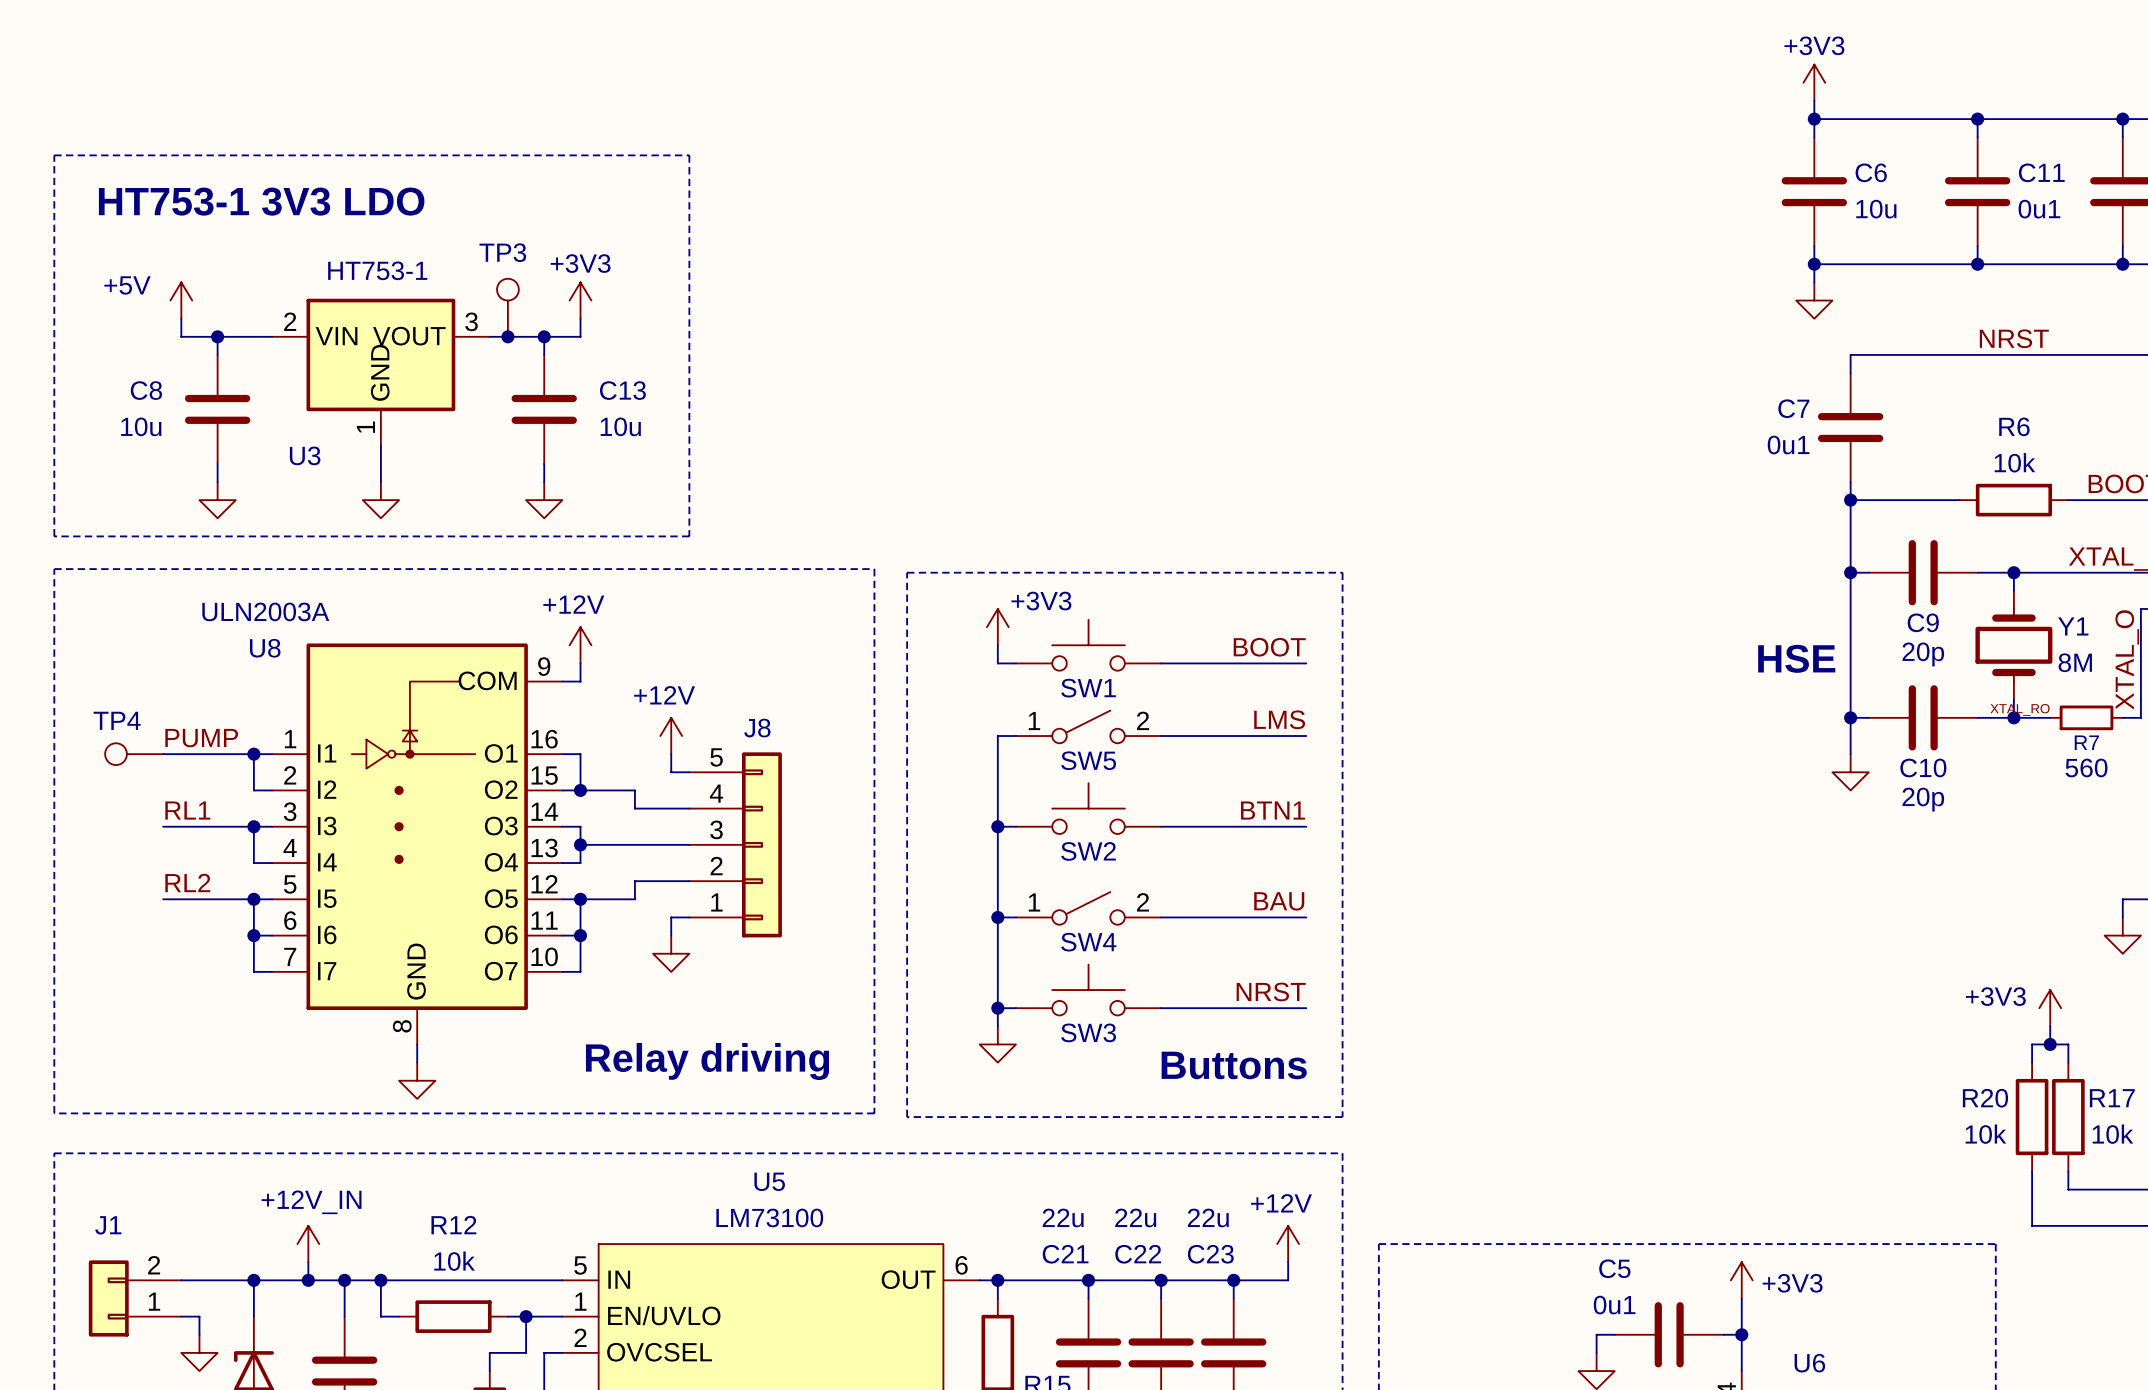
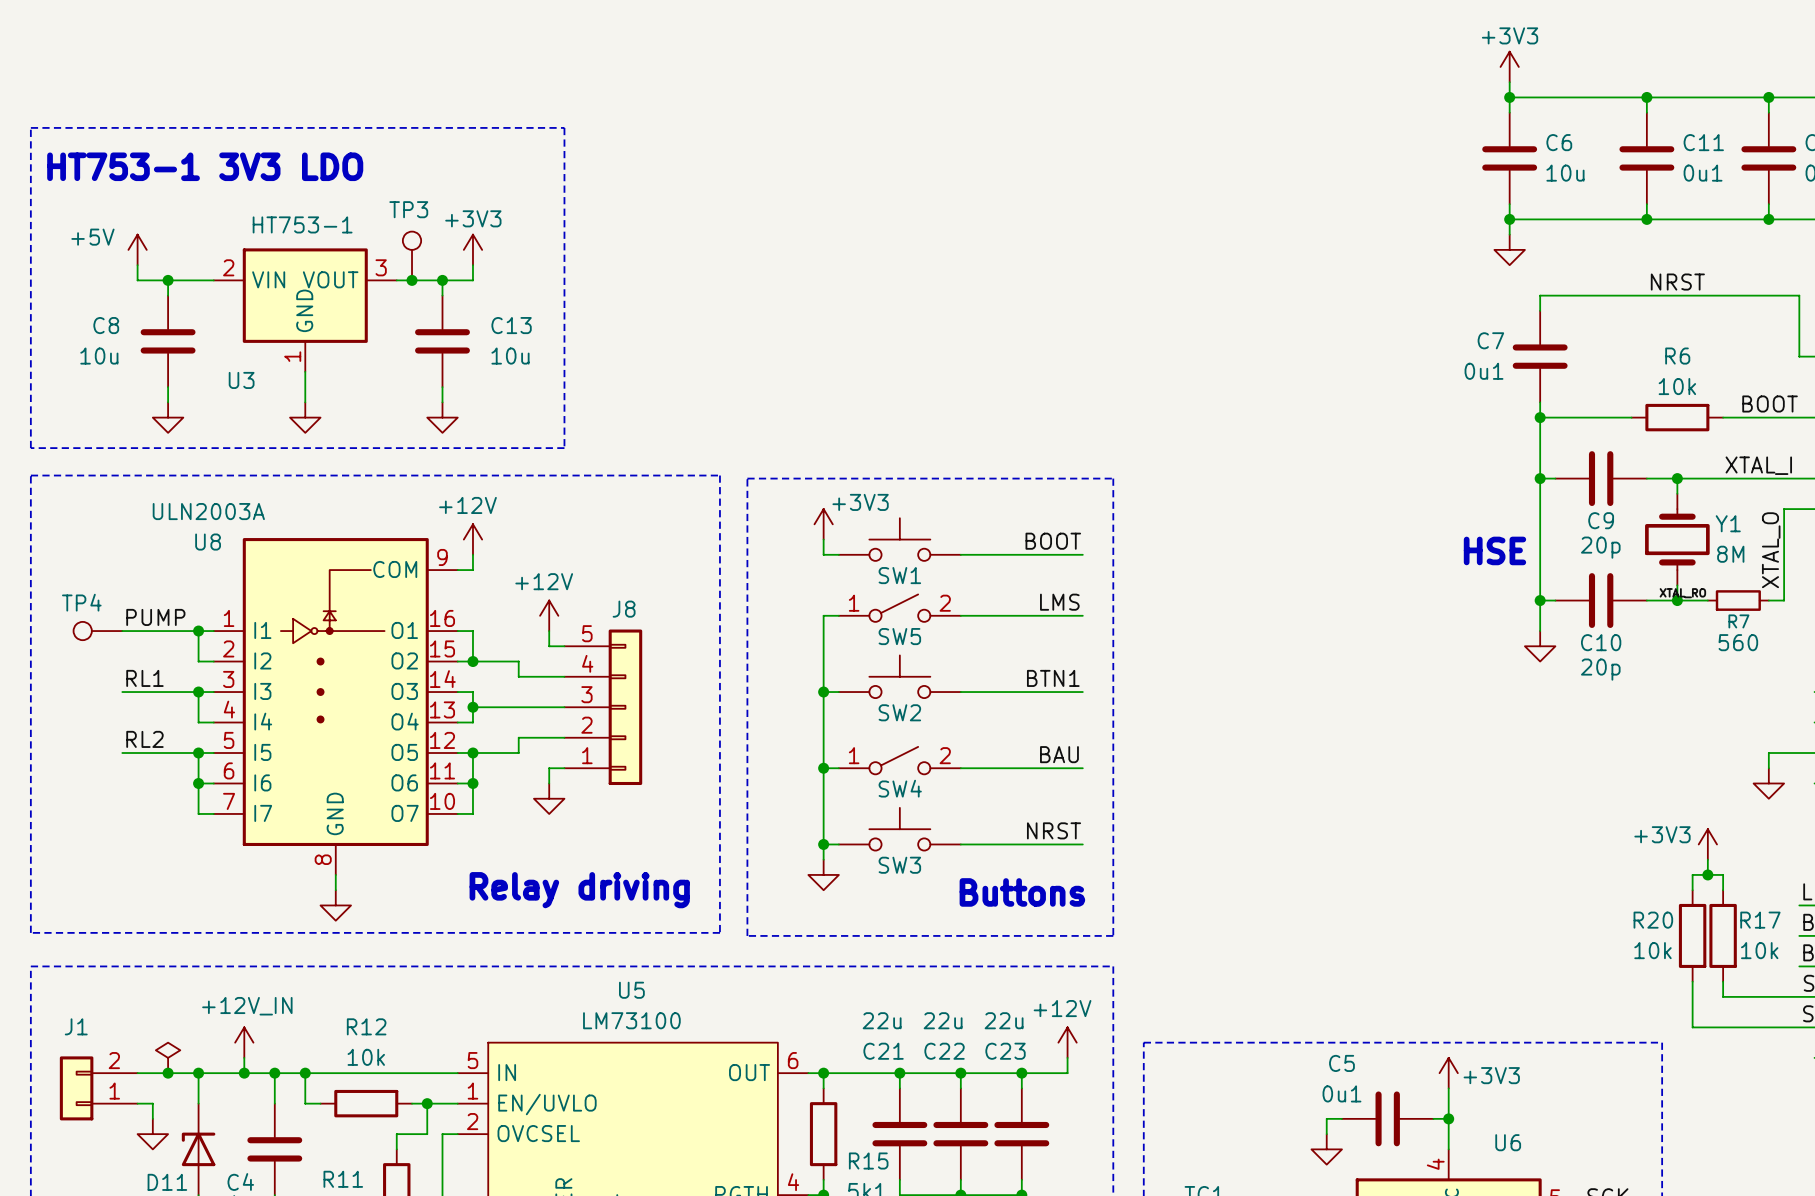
power symbol: none -> (168, 1057)
junction: none -> (168, 1073)

